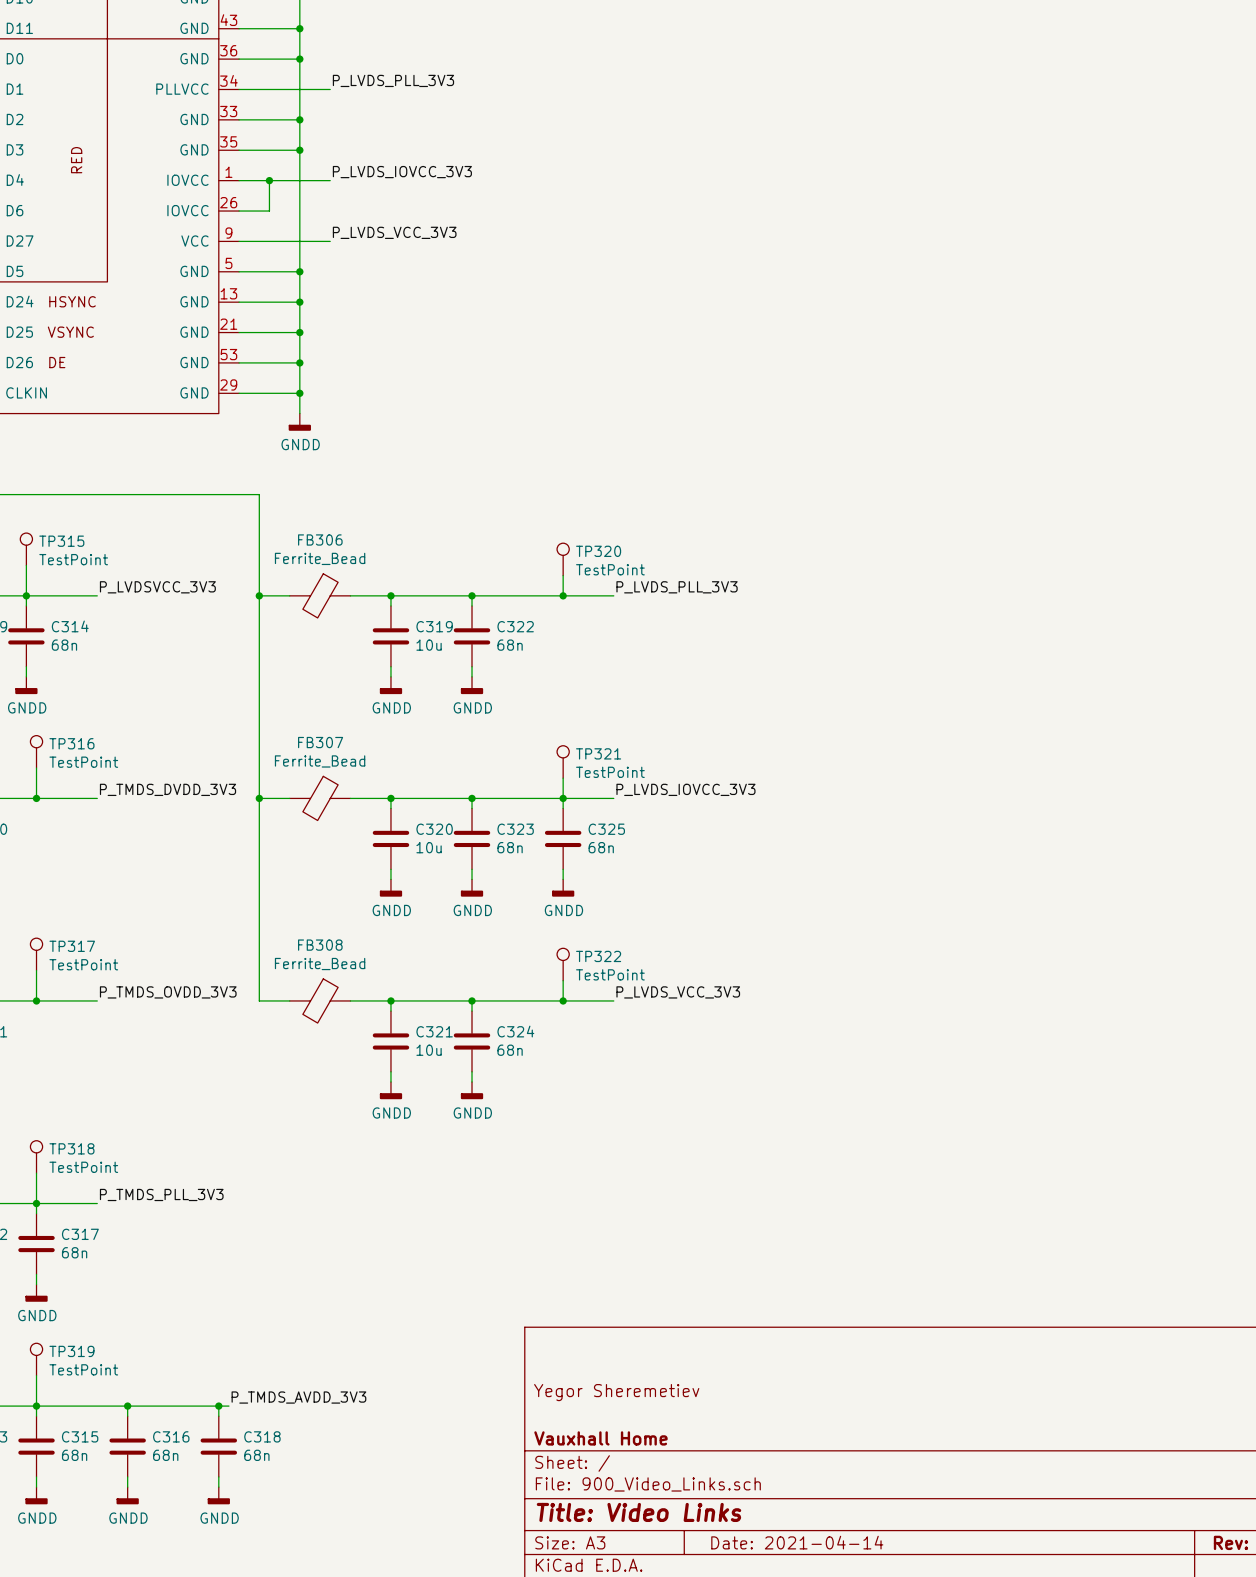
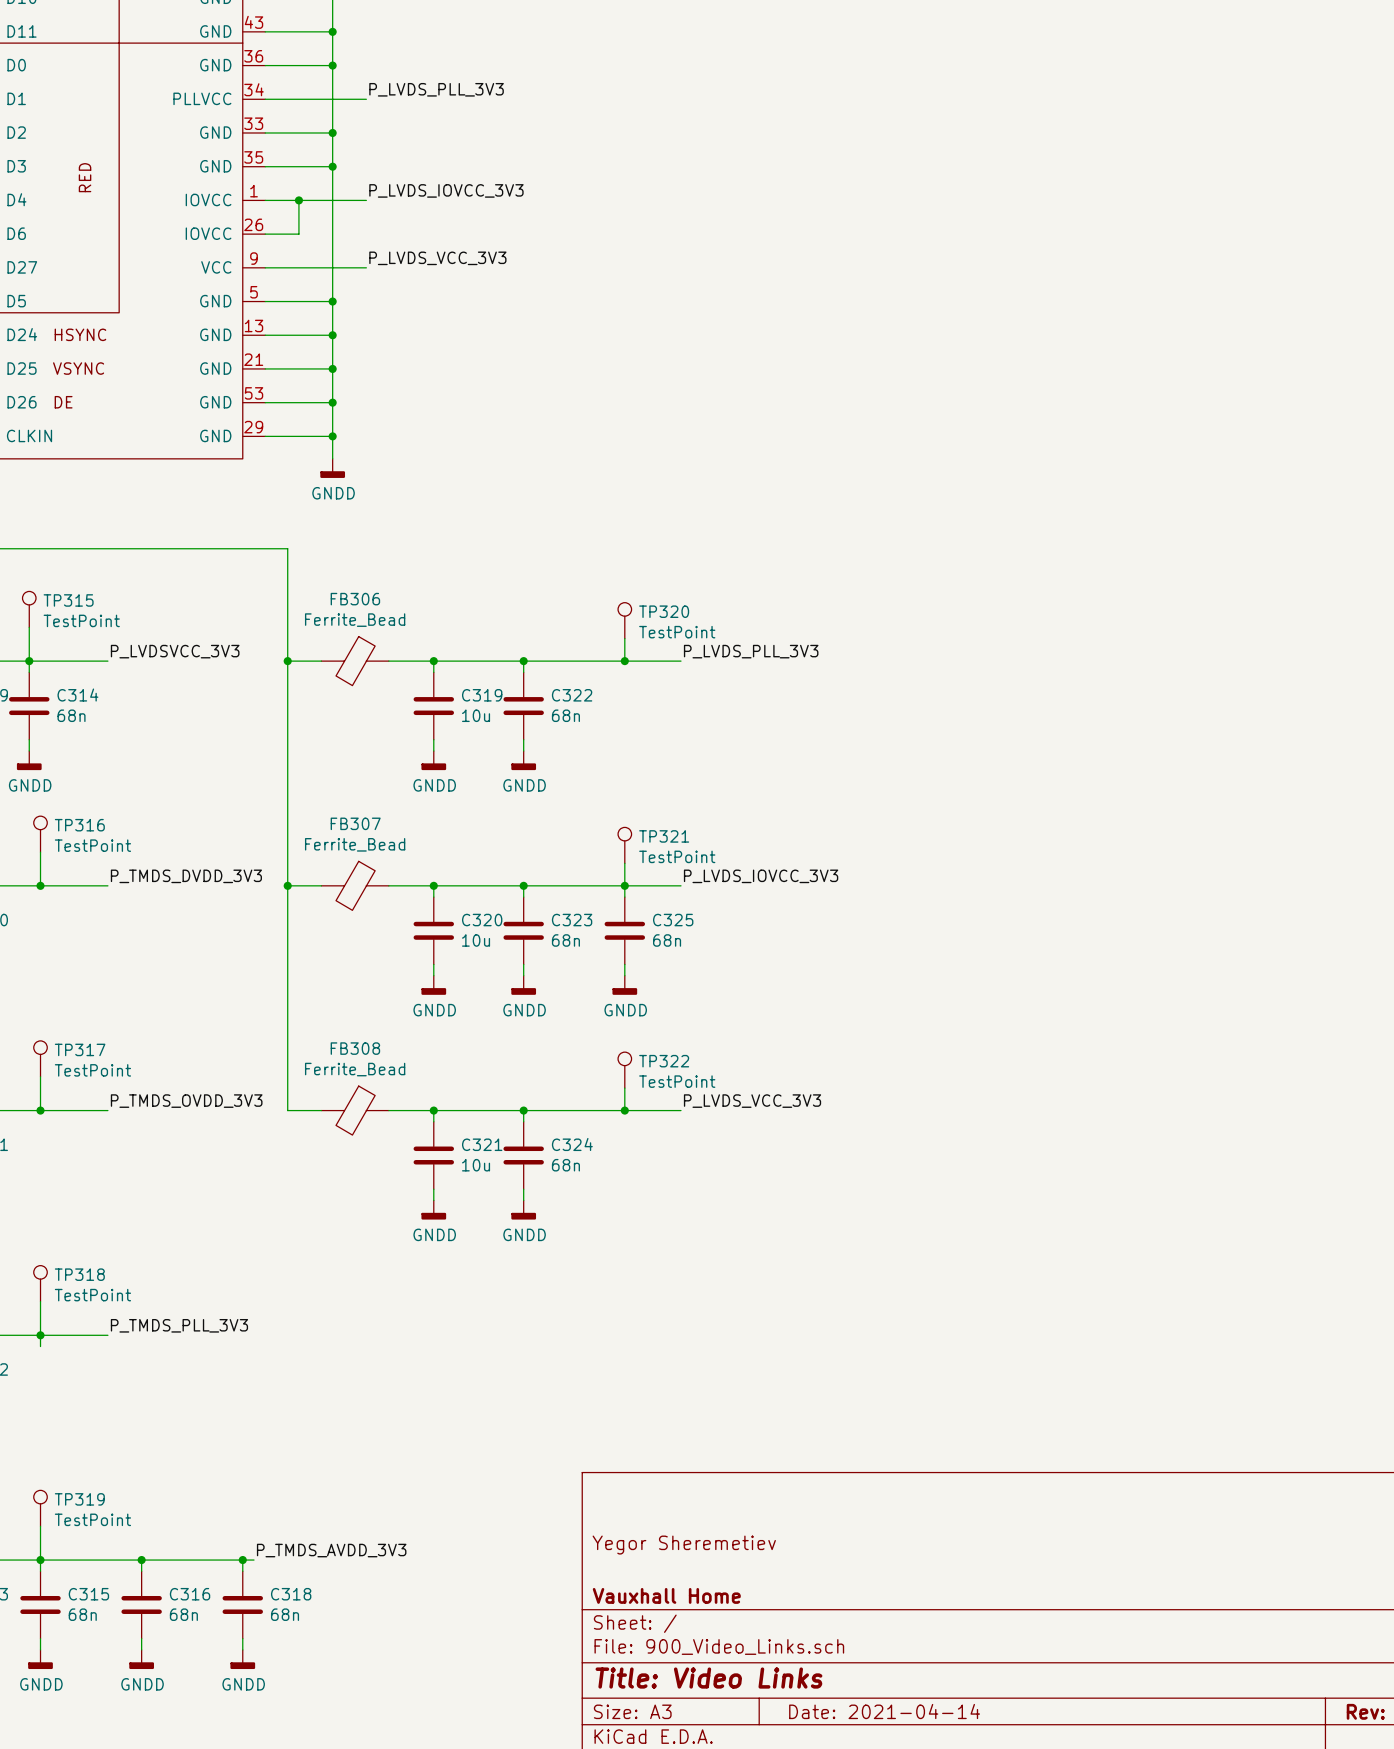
C317: 68n (36, 1244) -> none
wire: (36, 1274) (36, 1284) -> none
power symbol: GNDD (36, 1293) -> none

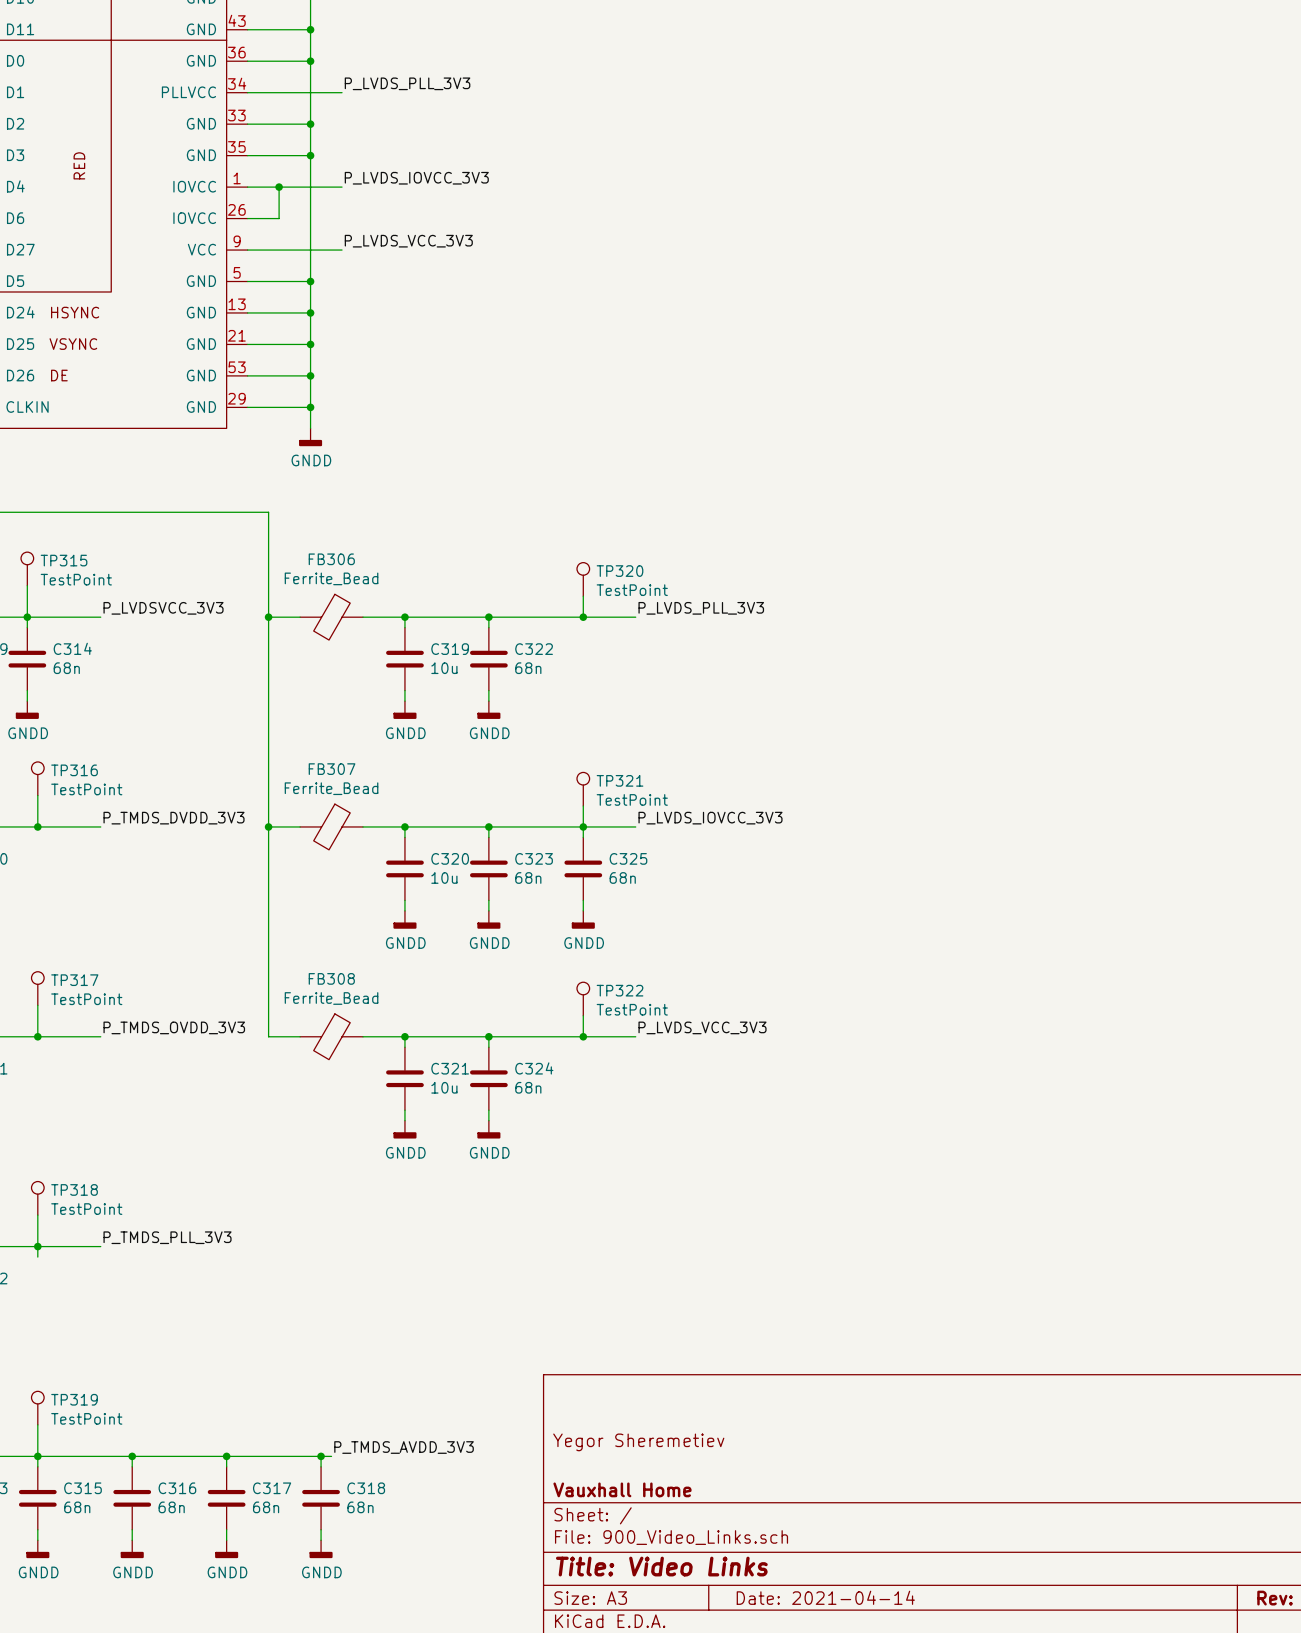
label position: P_TMDS_AVDD_3V3 (331, 1550) -> P_TMDS_AVDD_3V3 (404, 1447)
wire: none -> (237, 1456) (331, 1456)
wire: none -> (321, 1456) (321, 1466)
junction: none -> (321, 1456)
C318 name: C318 (291, 1594) -> C317 (272, 1488)
C318: none -> 68n (321, 1498)
wire: none -> (321, 1529) (321, 1540)
power symbol: none -> GNDD (321, 1549)

